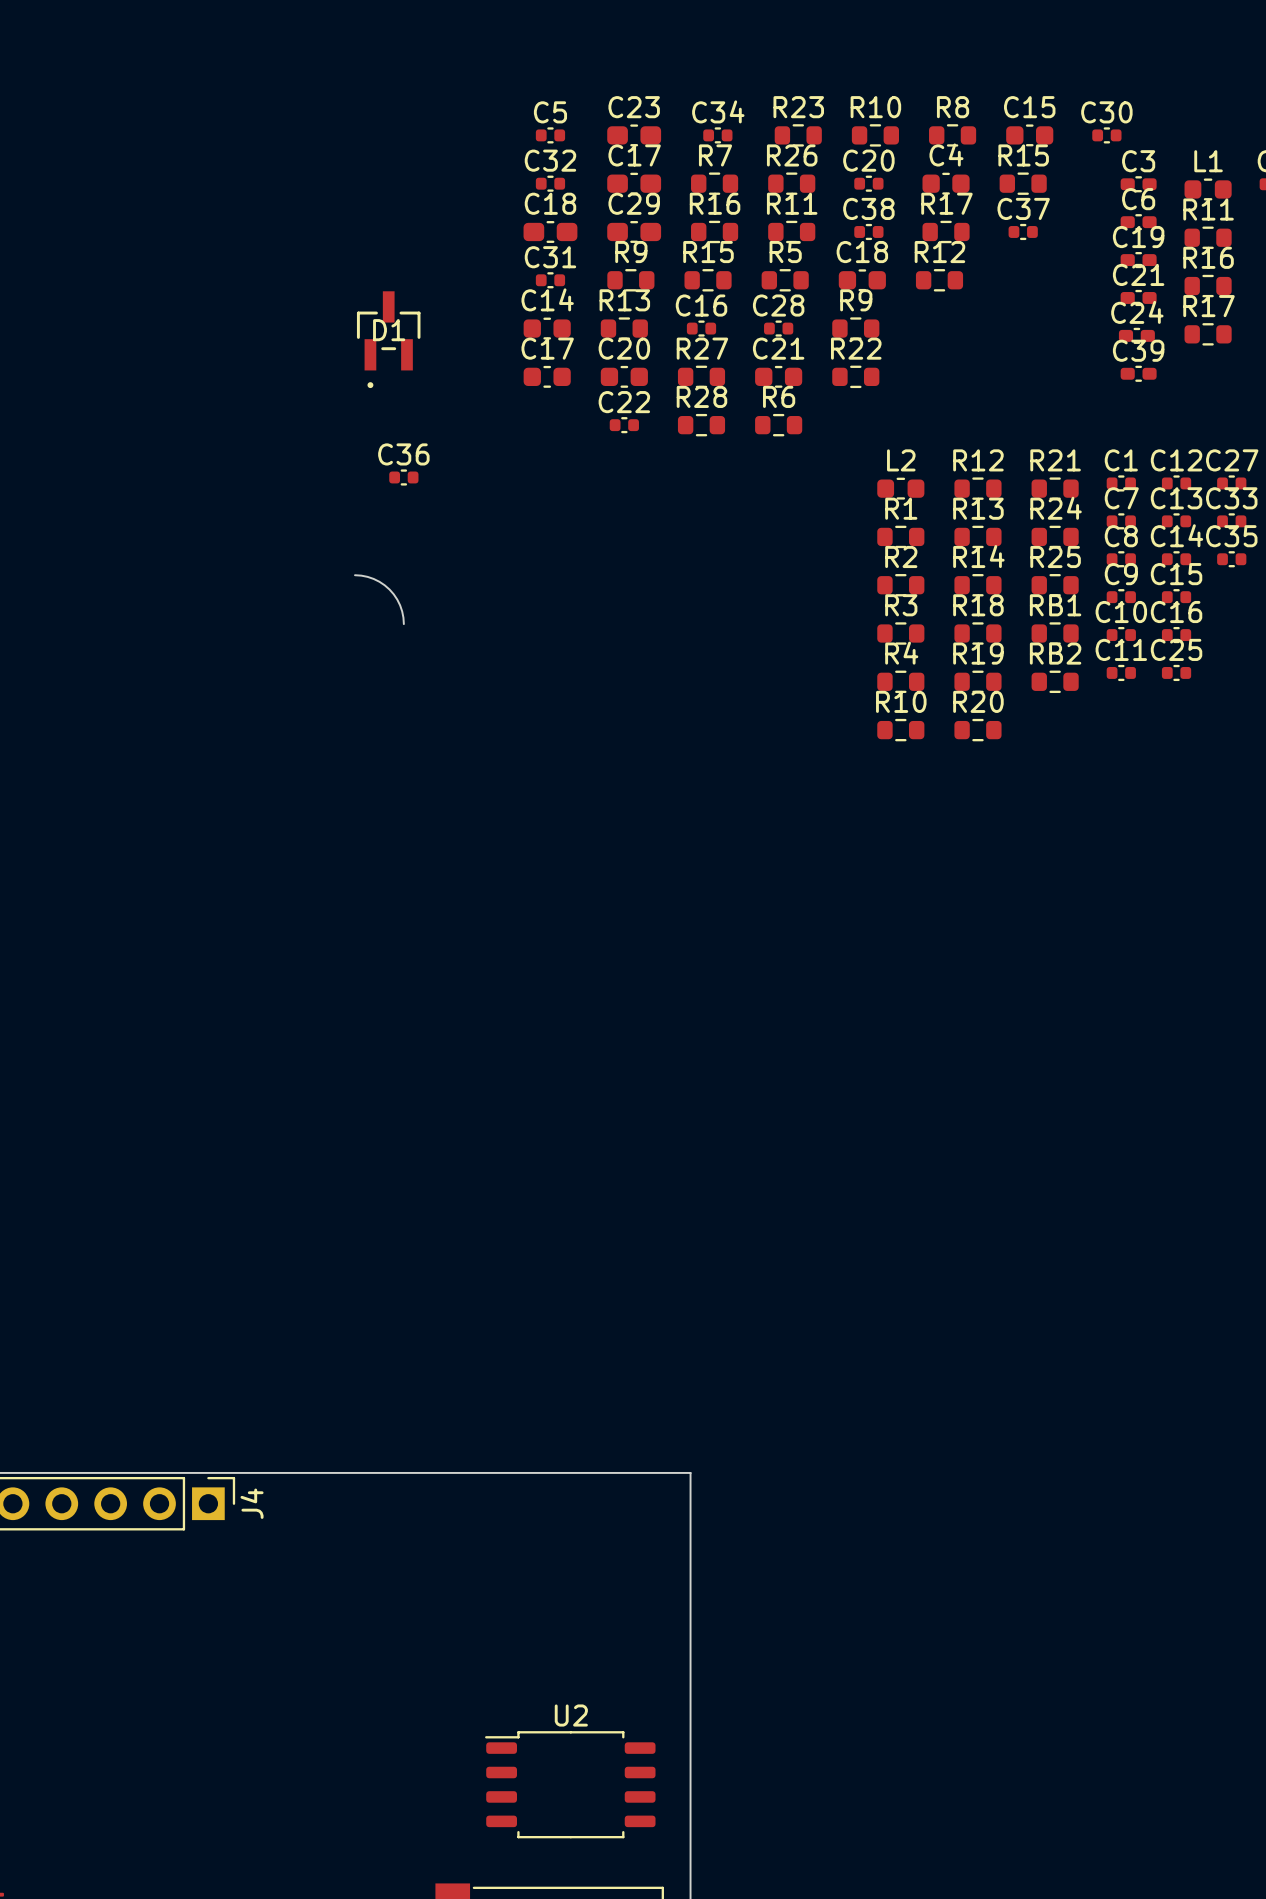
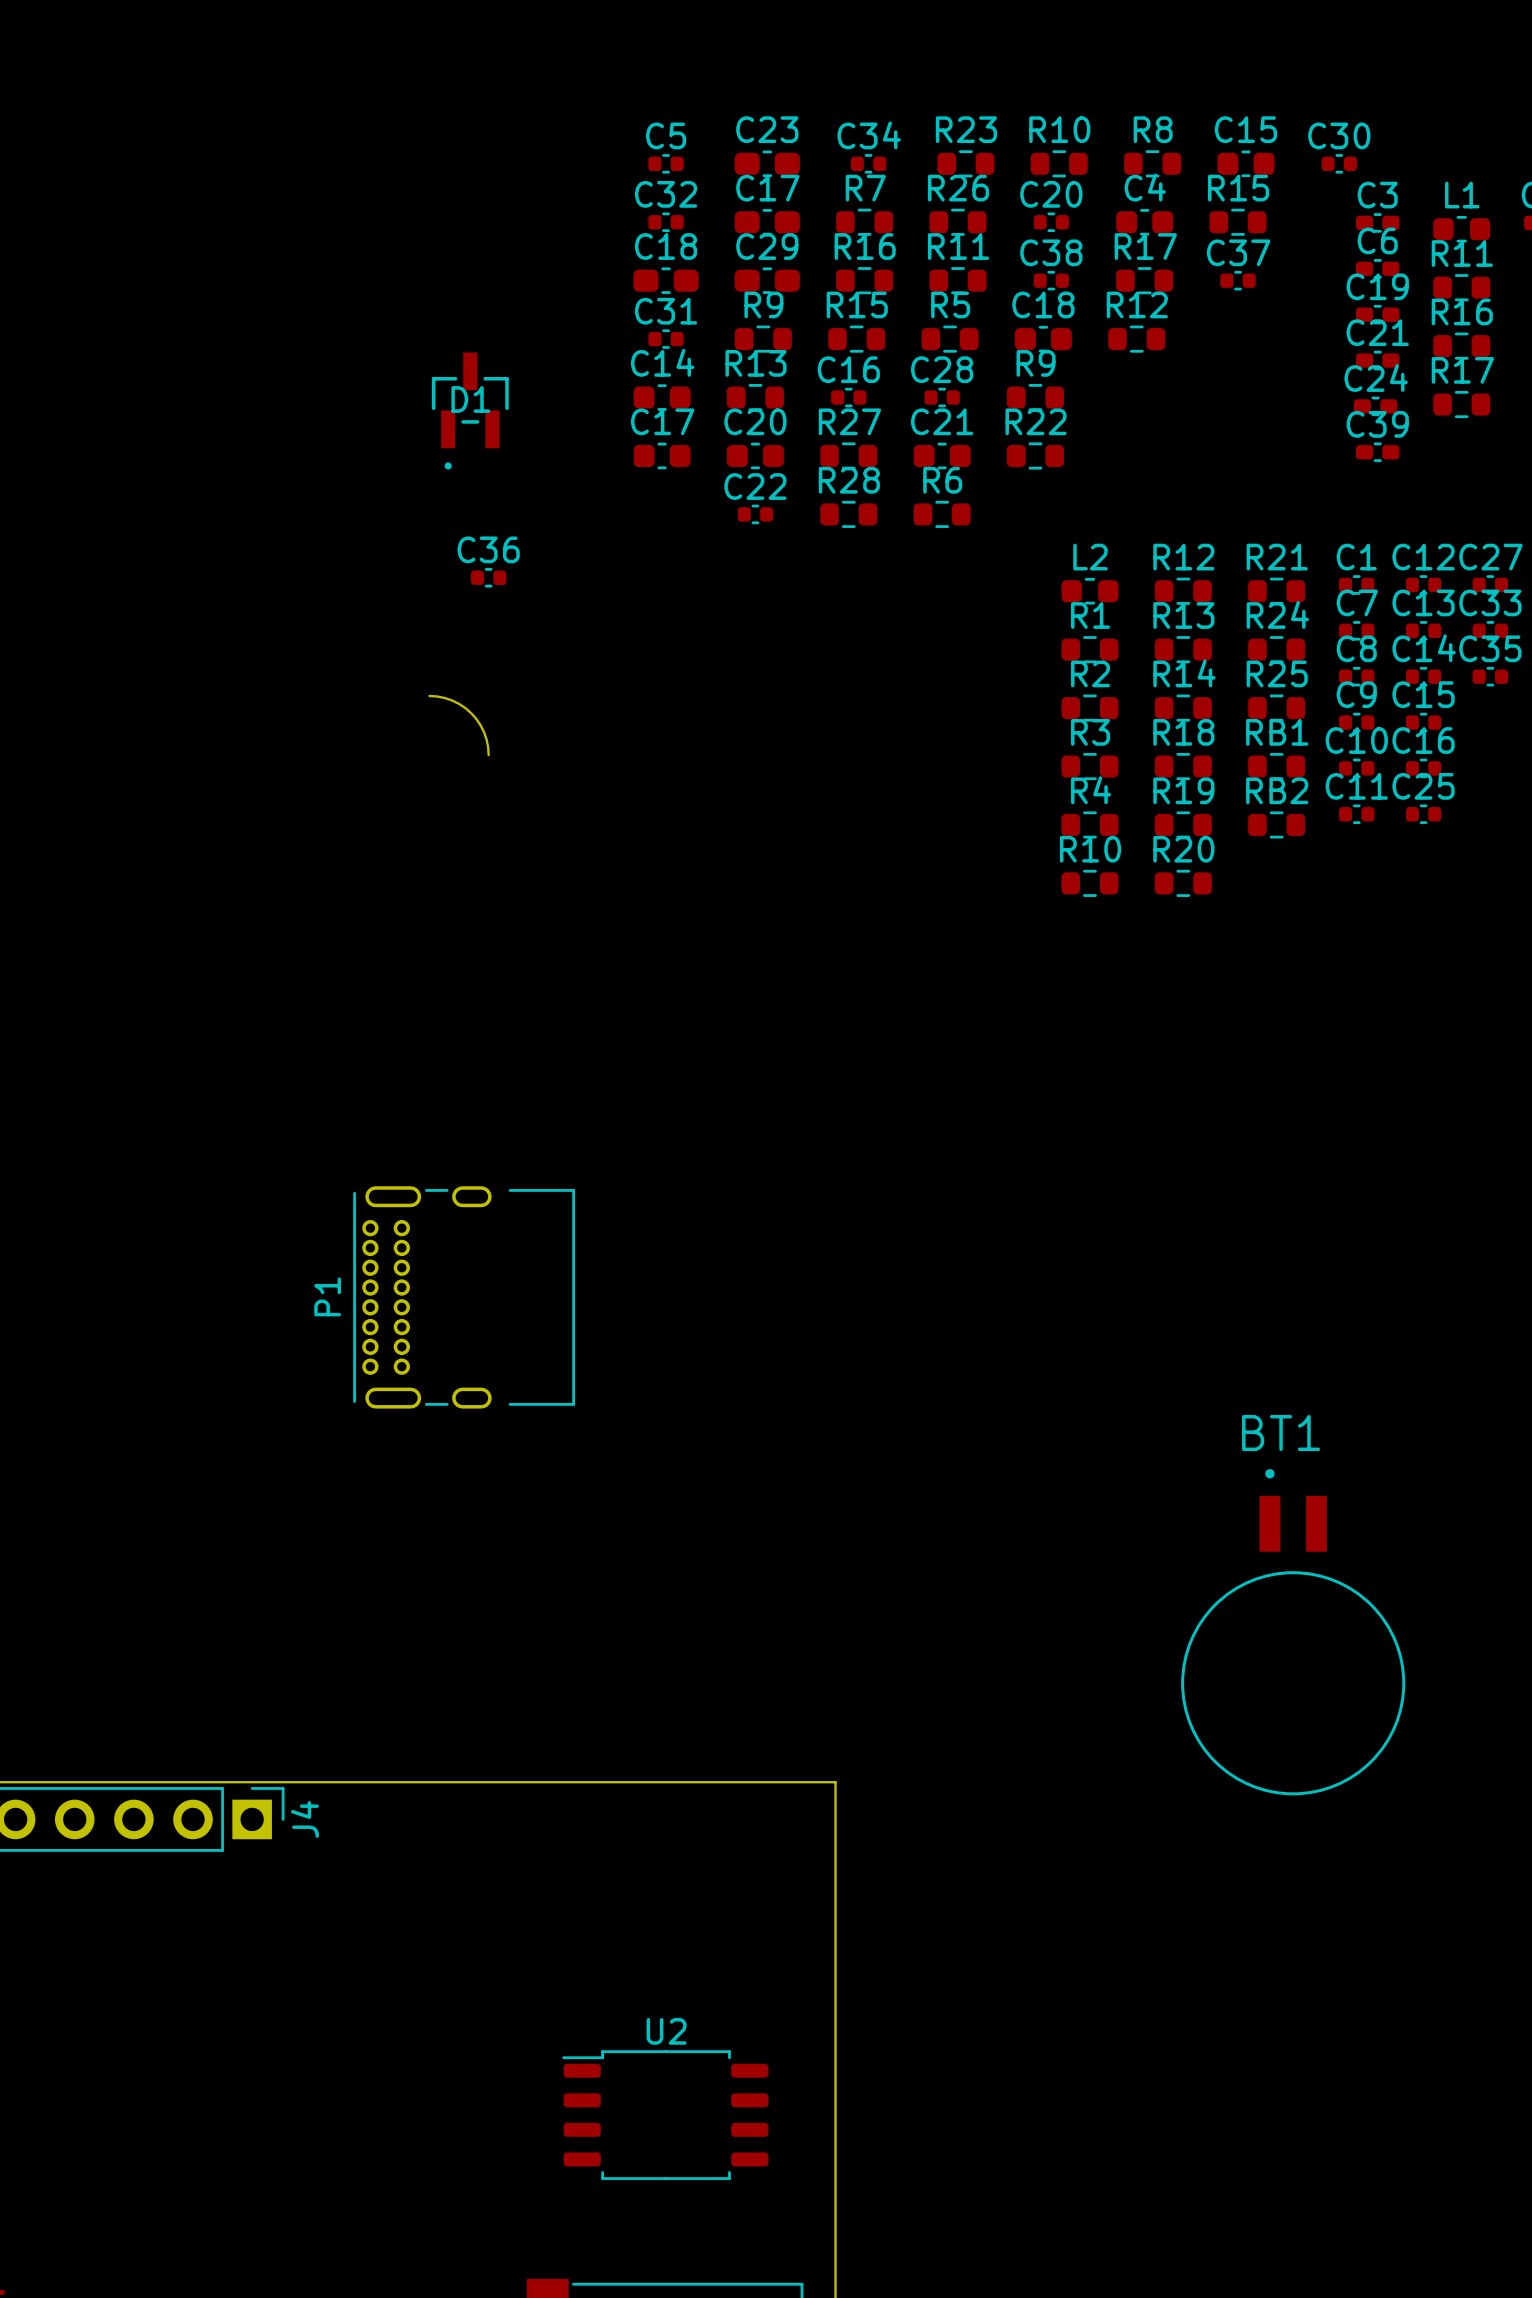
P1: none -> (464, 1297)
BT1: none -> (1293, 1632)
U2 position: (570, 1784) -> (665, 2115)

